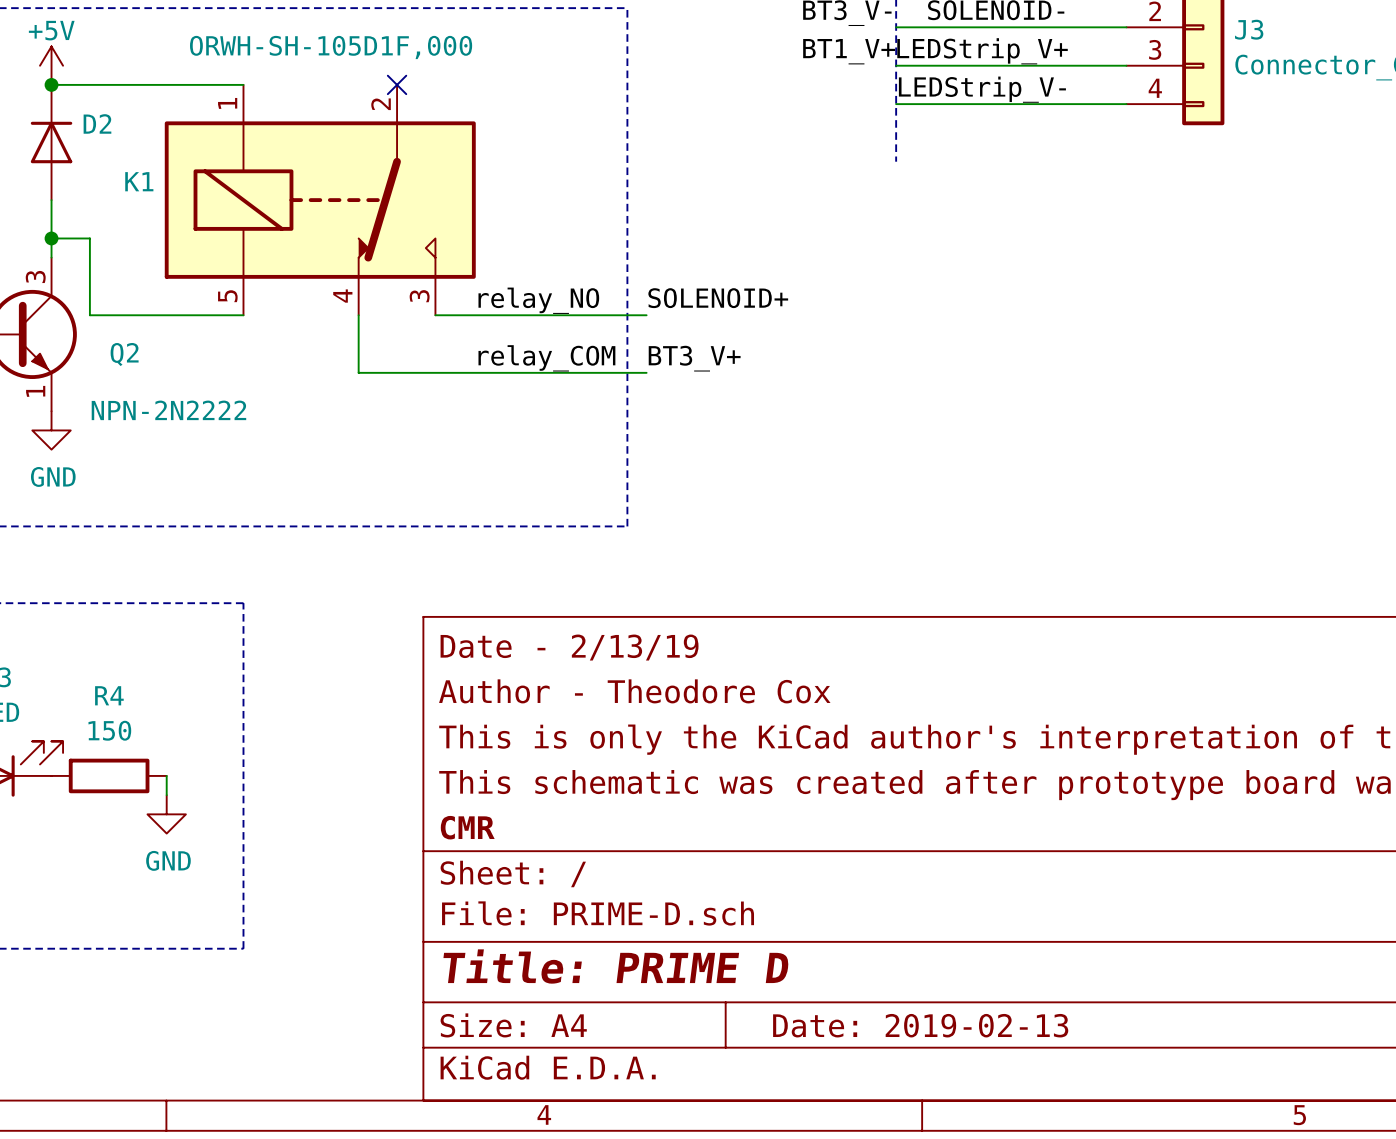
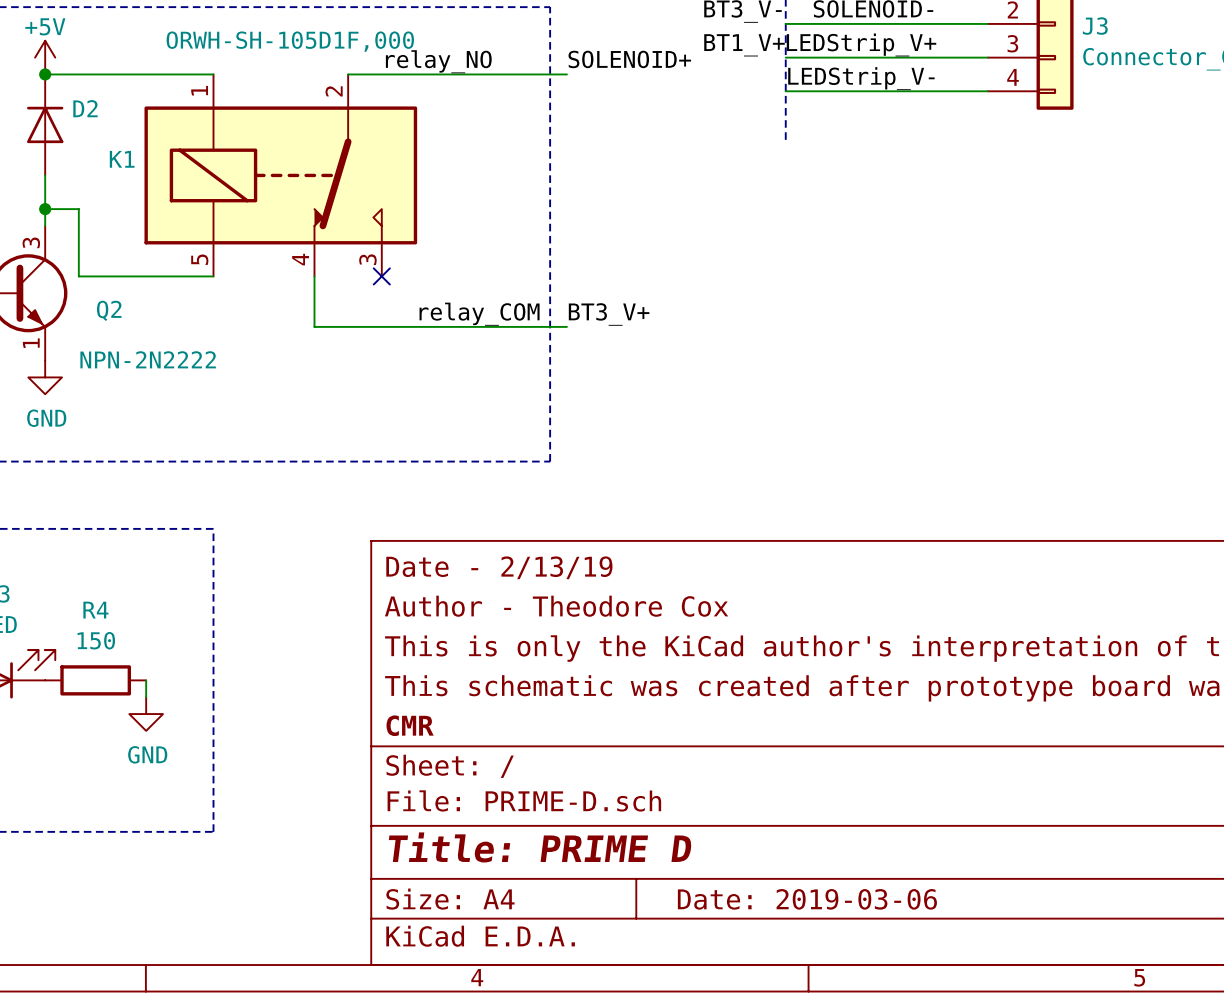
wire: none -> (348, 74) (566, 74)
no-connect mark: (397, 84) -> none
label position: SOLENOID+ (718, 298) -> SOLENOID+ (629, 59)
label position: relay_NO (538, 300) -> relay_NO (438, 61)
wire: (435, 315) (646, 315) -> none
no-connect mark: none -> (381, 276)
title block: Date: 2019-02-13 (920, 1025) -> Date: 2019-03-06 (807, 899)

